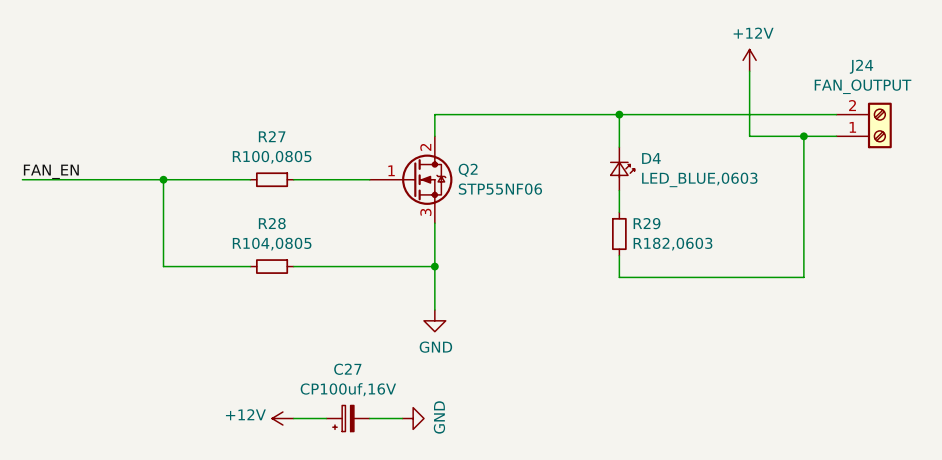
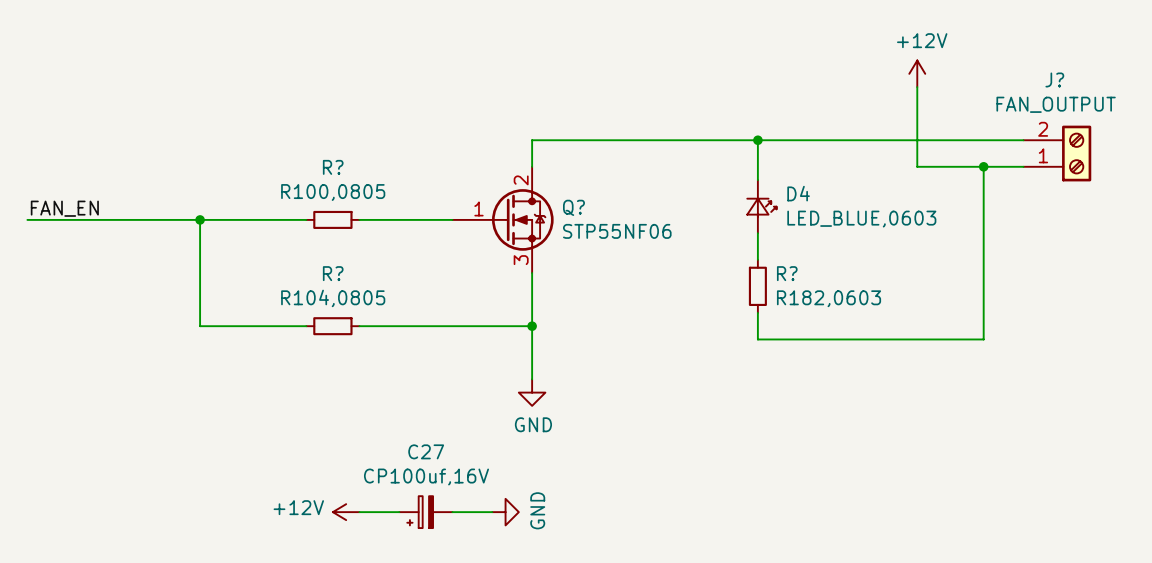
J24 name: J24 (861, 66) -> J? (1054, 79)
R27 name: R27 (272, 136) -> R? (333, 167)
Q2 name: Q2 (468, 170) -> Q? (573, 207)
R28 name: R28 (272, 223) -> R? (333, 273)
R29 name: R29 (647, 223) -> R? (787, 273)

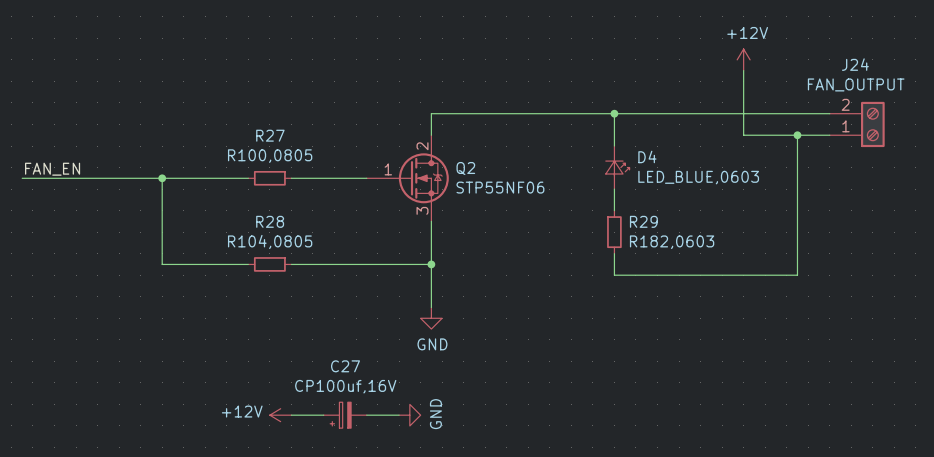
J? name: J? (1054, 79) -> J24 (855, 64)
R? name: R? (333, 167) -> R27 (270, 135)
Q? name: Q? (573, 207) -> Q2 (465, 168)
R? name: R? (333, 273) -> R28 (270, 221)
R? name: R? (787, 273) -> R29 (643, 221)

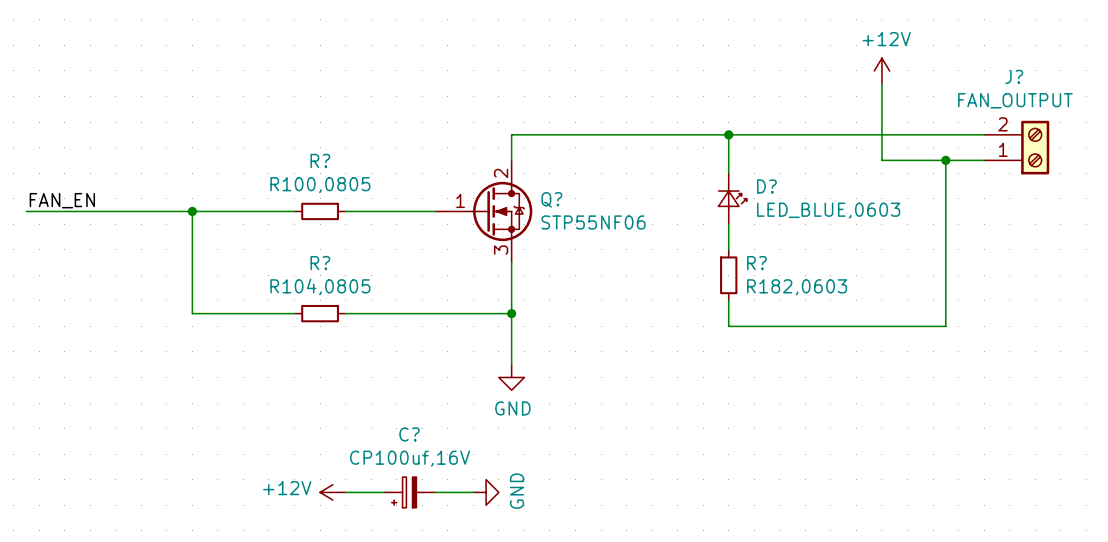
J24 name: J24 (855, 64) -> J? (1014, 76)
R27 name: R27 (270, 135) -> R? (320, 160)
D4 name: D4 (647, 156) -> D? (766, 186)
Q2 name: Q2 (465, 168) -> Q? (551, 199)
R28 name: R28 (270, 221) -> R? (320, 263)
R29 name: R29 (643, 221) -> R? (756, 263)
C27 name: C27 (345, 366) -> C? (409, 434)

